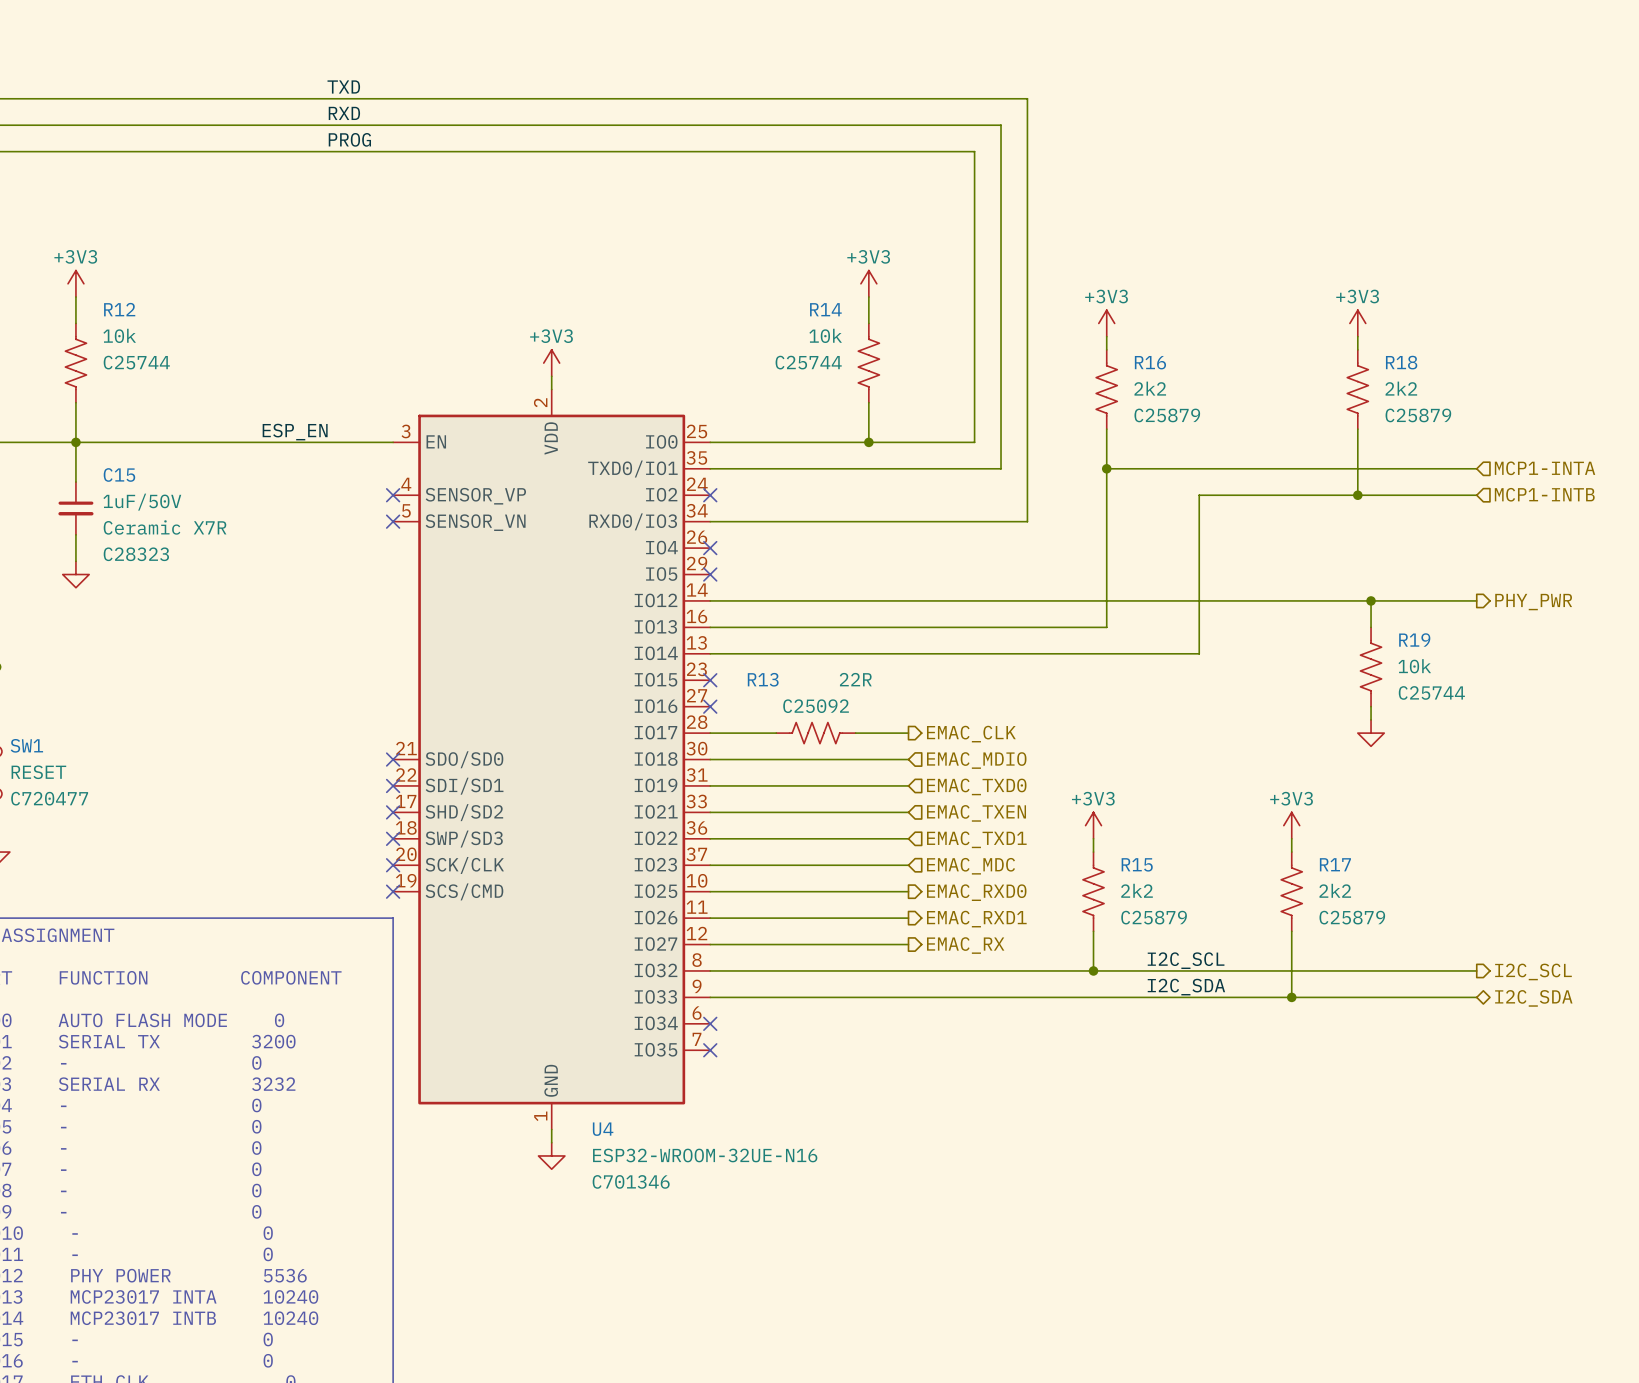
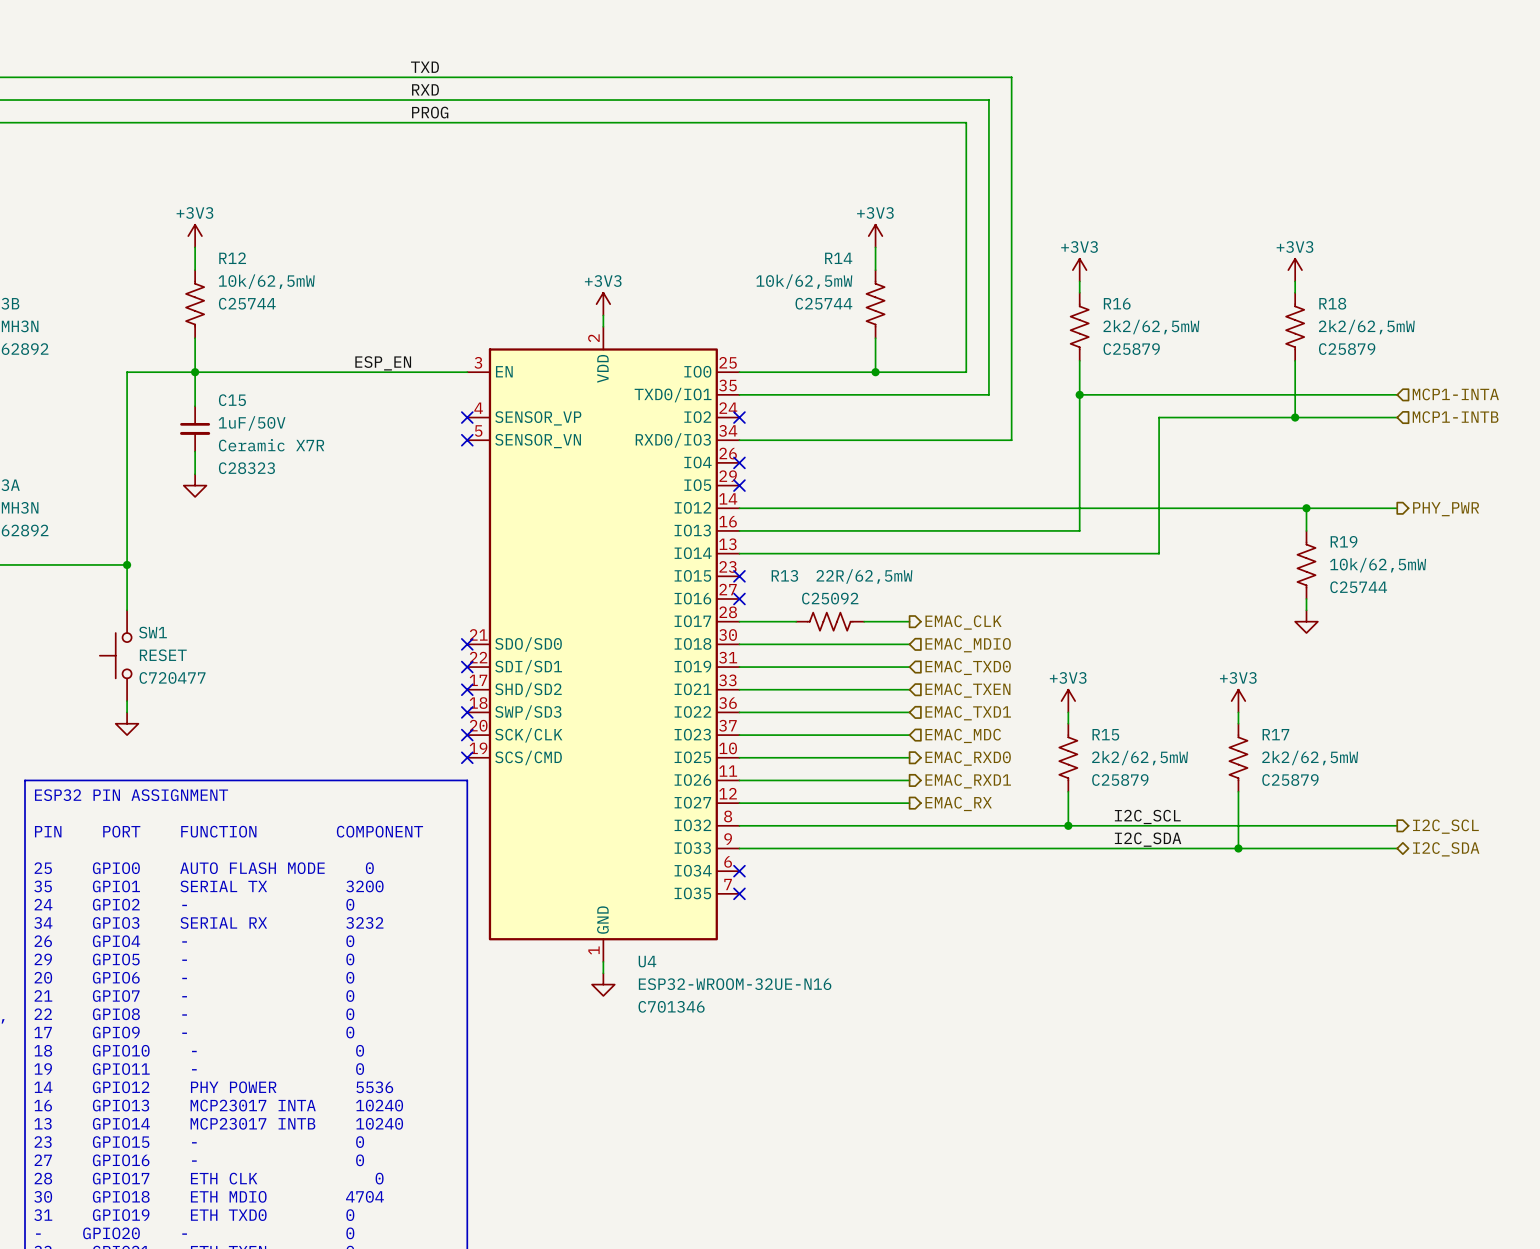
R12 value: 10k (119, 335) -> 10k/62,5mW (266, 281)
R14 value: 10k (825, 335) -> 10k/62,5mW (804, 281)
R16 value: 2k2 (1150, 388) -> 2k2/62,5mW (1151, 327)
R18 value: 2k2 (1401, 388) -> 2k2/62,5mW (1366, 327)
R19 value: 10k (1414, 666) -> 10k/62,5mW (1378, 565)
R13 value: 22R (855, 679) -> 22R/62,5mW (864, 576)
R15 value: 2k2 (1137, 890) -> 2k2/62,5mW (1140, 757)
R17 value: 2k2 (1335, 890) -> 2k2/62,5mW (1310, 757)

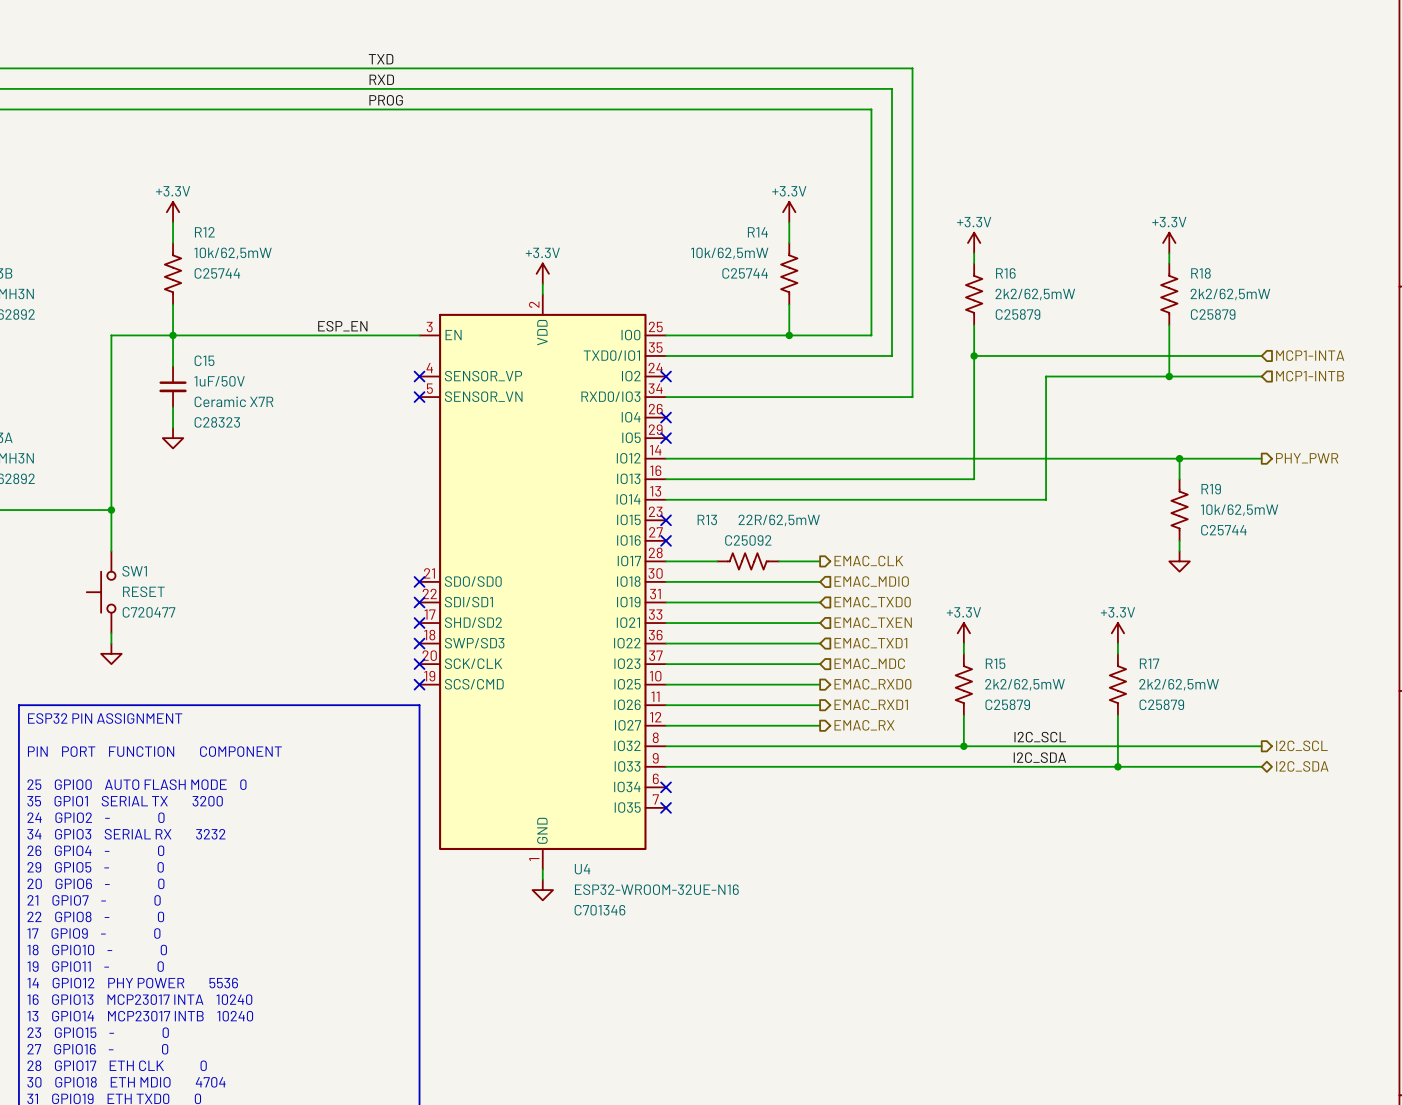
power symbol: +3V3 (195, 236) -> +3.3V (173, 212)
power symbol: +3V3 (875, 236) -> +3.3V (789, 212)
power symbol: +3V3 (1079, 270) -> +3.3V (974, 243)
power symbol: +3V3 (1295, 270) -> +3.3V (1169, 243)
power symbol: +3V3 (603, 304) -> +3.3V (542, 273)
power symbol: +3V3 (1068, 701) -> +3.3V (963, 633)
power symbol: +3V3 (1238, 701) -> +3.3V (1117, 633)

